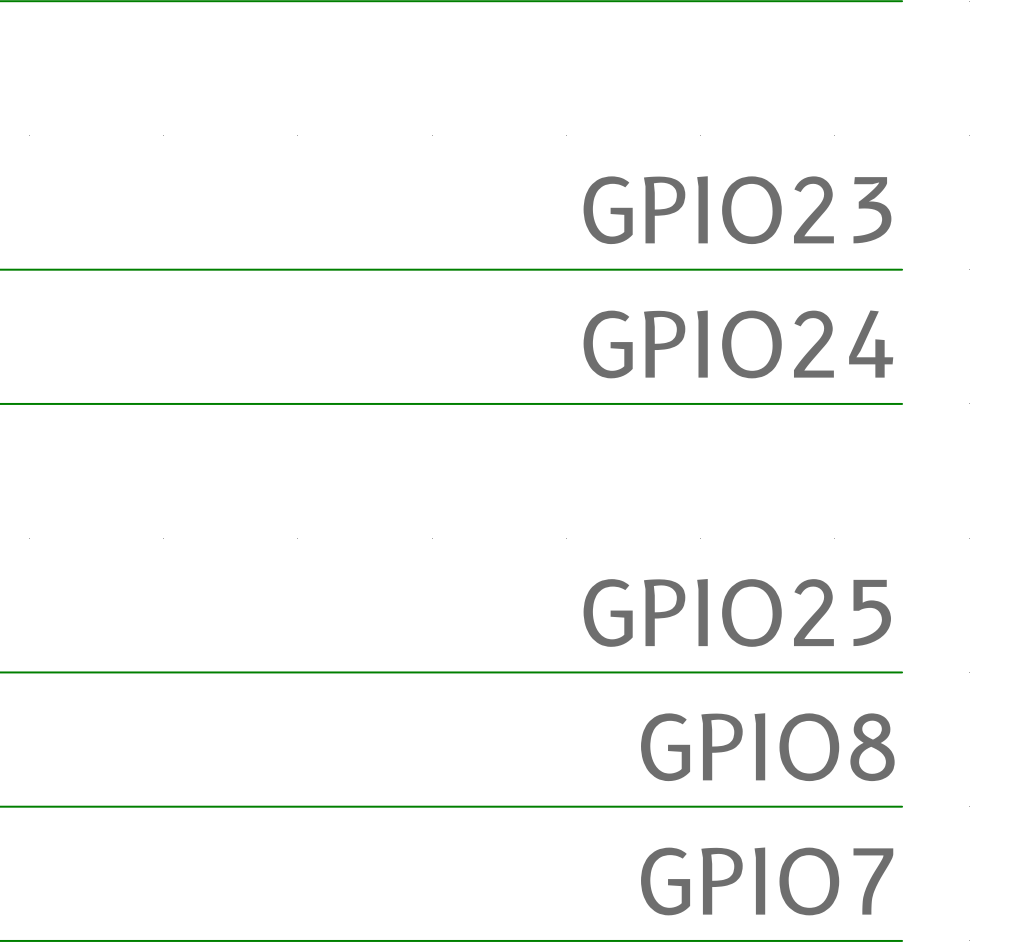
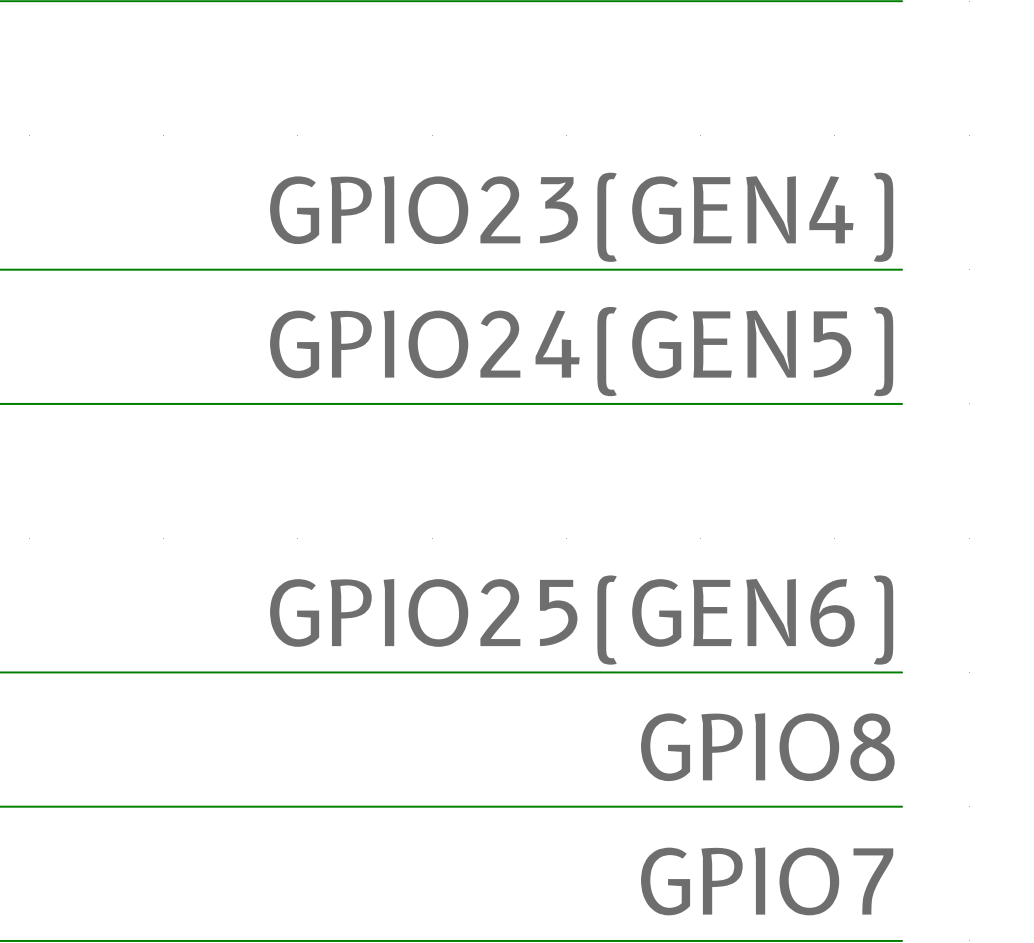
label: GPIO23 (737, 210) -> GPIO23(GEN4) (581, 217)
label: GPIO24 (738, 344) -> GPIO24(GEN5) (581, 351)
label: GPIO25 (737, 612) -> GPIO25(GEN6) (581, 620)

